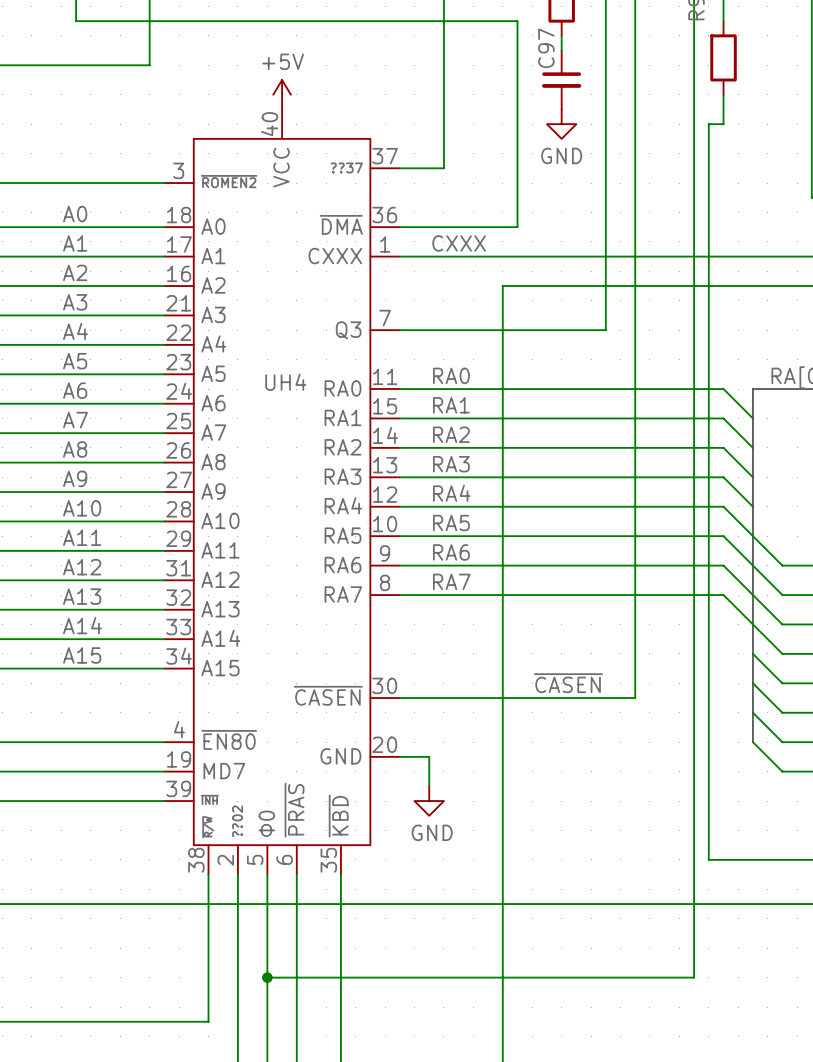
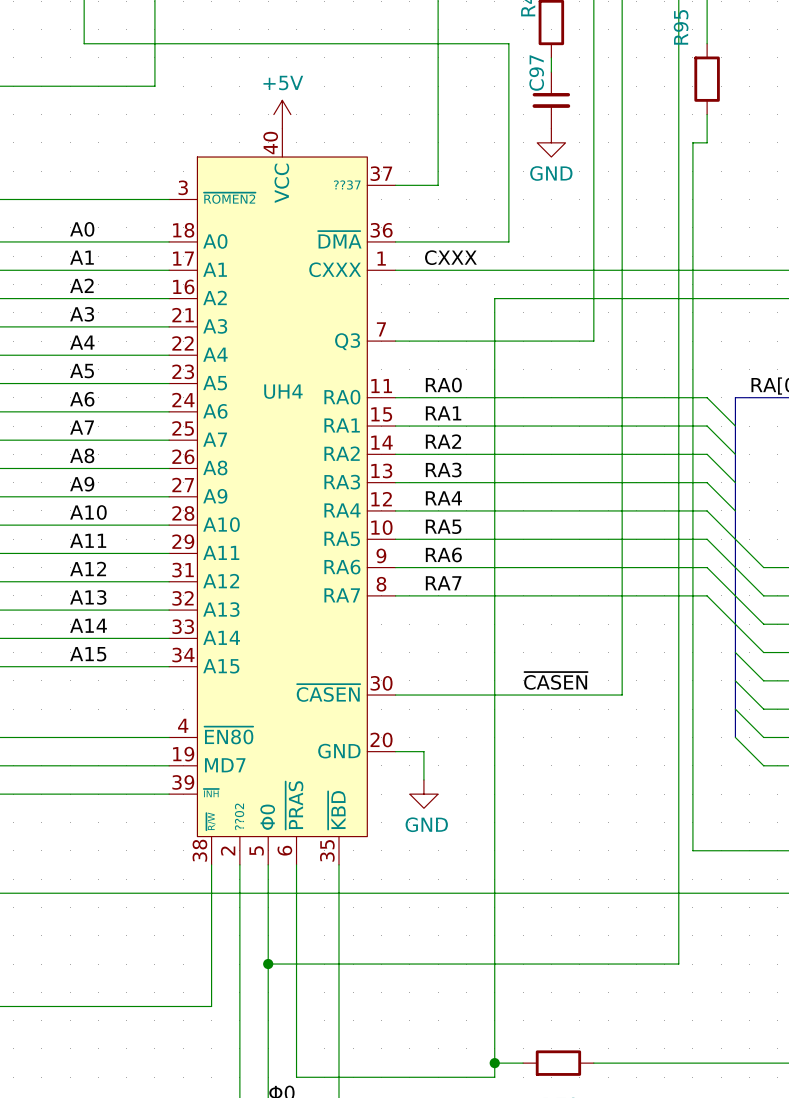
UH4 symbol: [164, 109, 400, 875] -> [169, 128, 396, 865]

